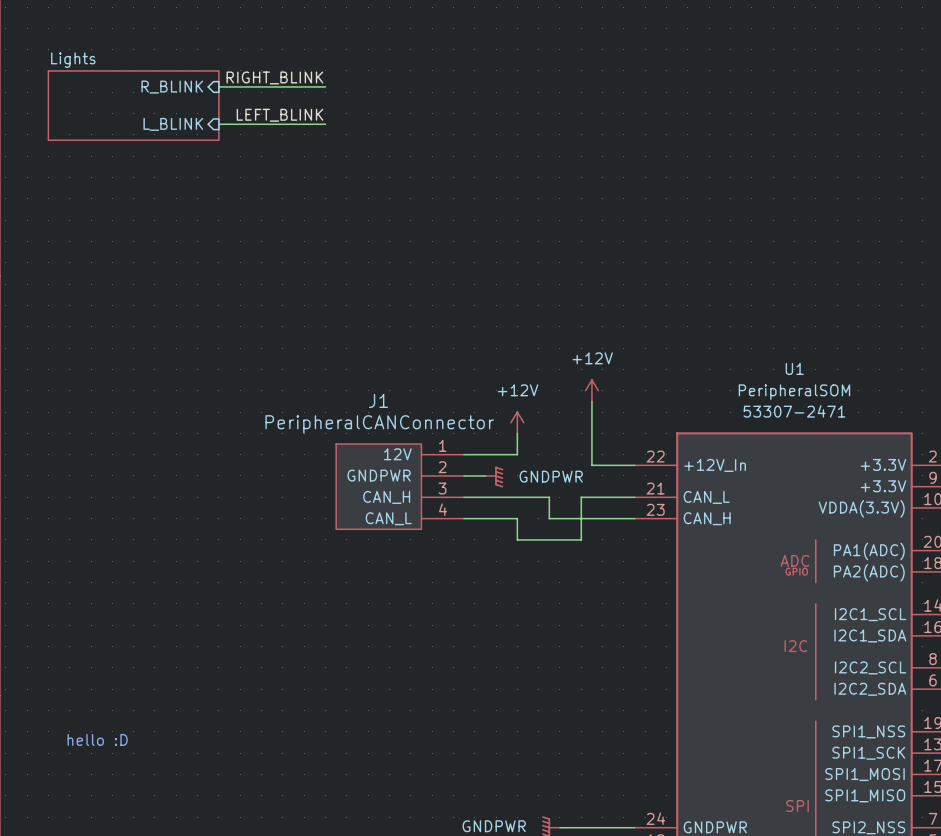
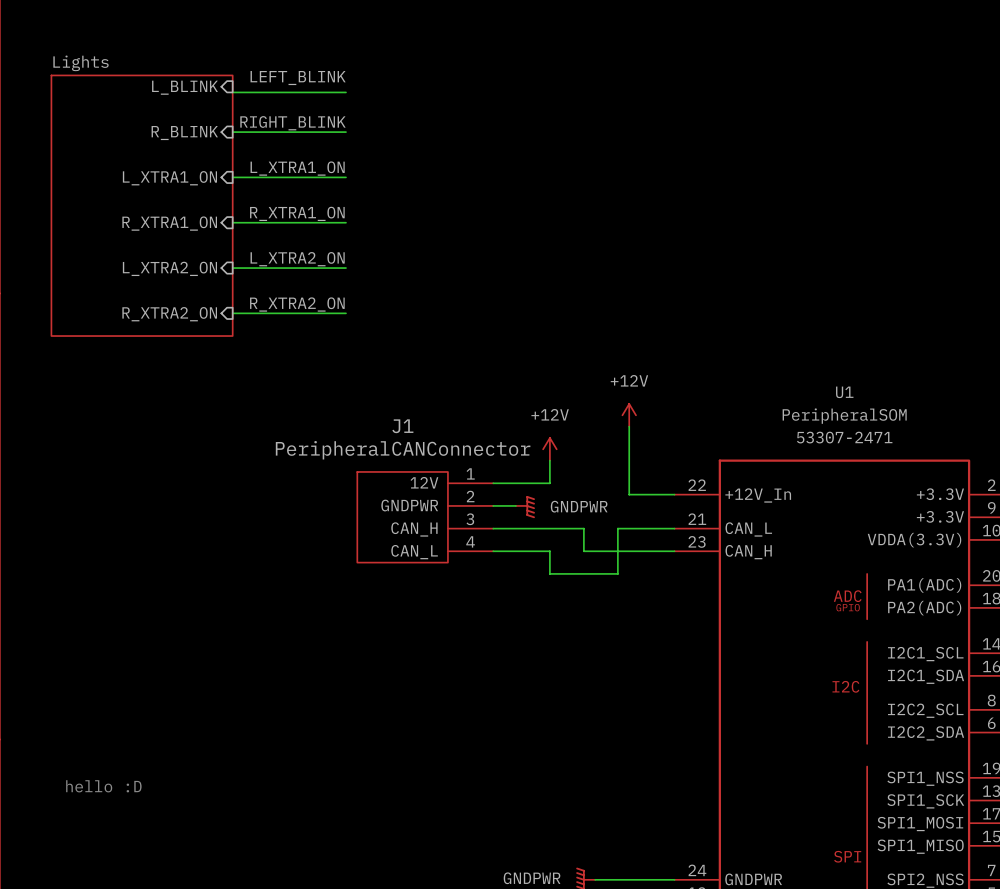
label: RIGHT_BLINK (274, 77) -> LEFT_BLINK (298, 78)
sheet pin: R_BLINK (172, 87) -> L_BLINK (185, 87)
sheet Lights: (133, 105) -> none
label: LEFT_BLINK (279, 115) -> RIGHT_BLINK (292, 123)
sheet pin: L_BLINK (173, 124) -> R_BLINK (184, 133)
label: none -> L_XTRA1_ON (297, 168)
wire: none -> (232, 177) (345, 177)
sheet pin: none -> L_XTRA1_ON (169, 178)
sheet Lights: none -> (142, 205)
label: none -> R_XTRA1_ON (297, 213)
sheet pin: none -> R_XTRA1_ON (169, 223)
wire: none -> (232, 222) (345, 222)
label: none -> L_XTRA2_ON (297, 259)
sheet pin: none -> L_XTRA2_ON (169, 268)
wire: none -> (232, 268) (345, 268)
label: none -> R_XTRA2_ON (297, 304)
sheet pin: none -> R_XTRA2_ON (169, 314)
wire: none -> (232, 313) (345, 313)

